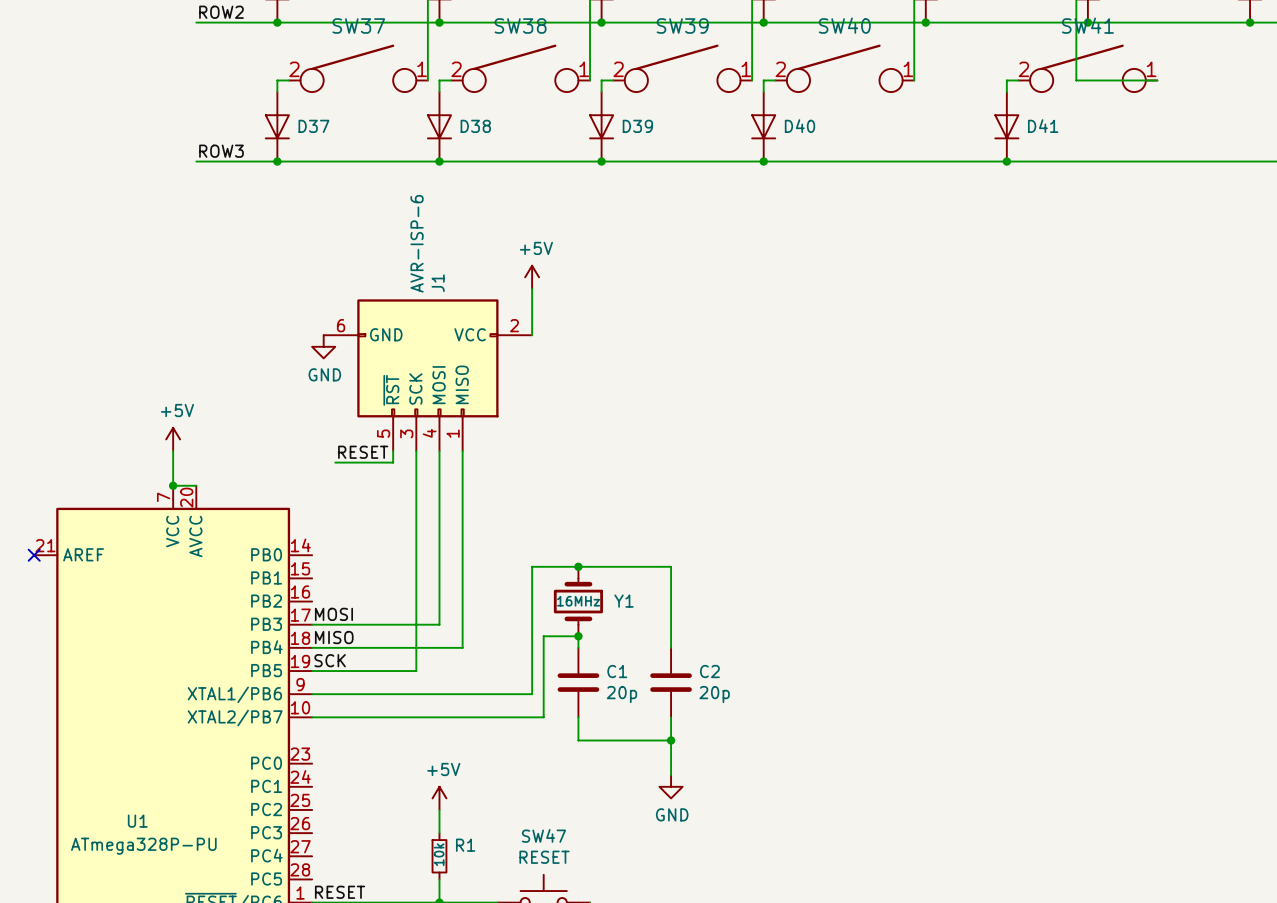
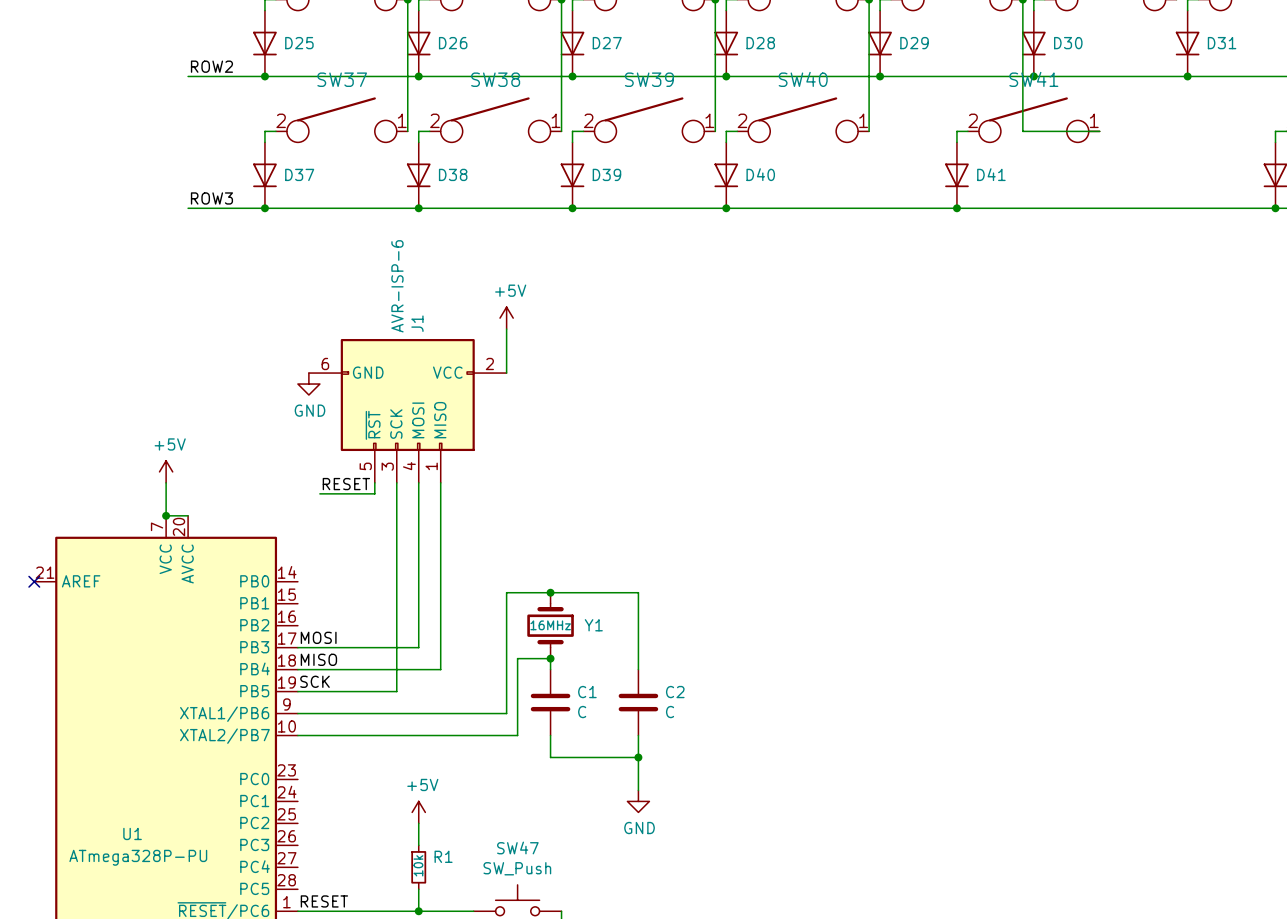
C1 value: 20p (621, 694) -> C (582, 712)
C2 value: 20p (714, 694) -> C (670, 712)
SW47 value: RESET (544, 857) -> SW_Push (517, 868)

